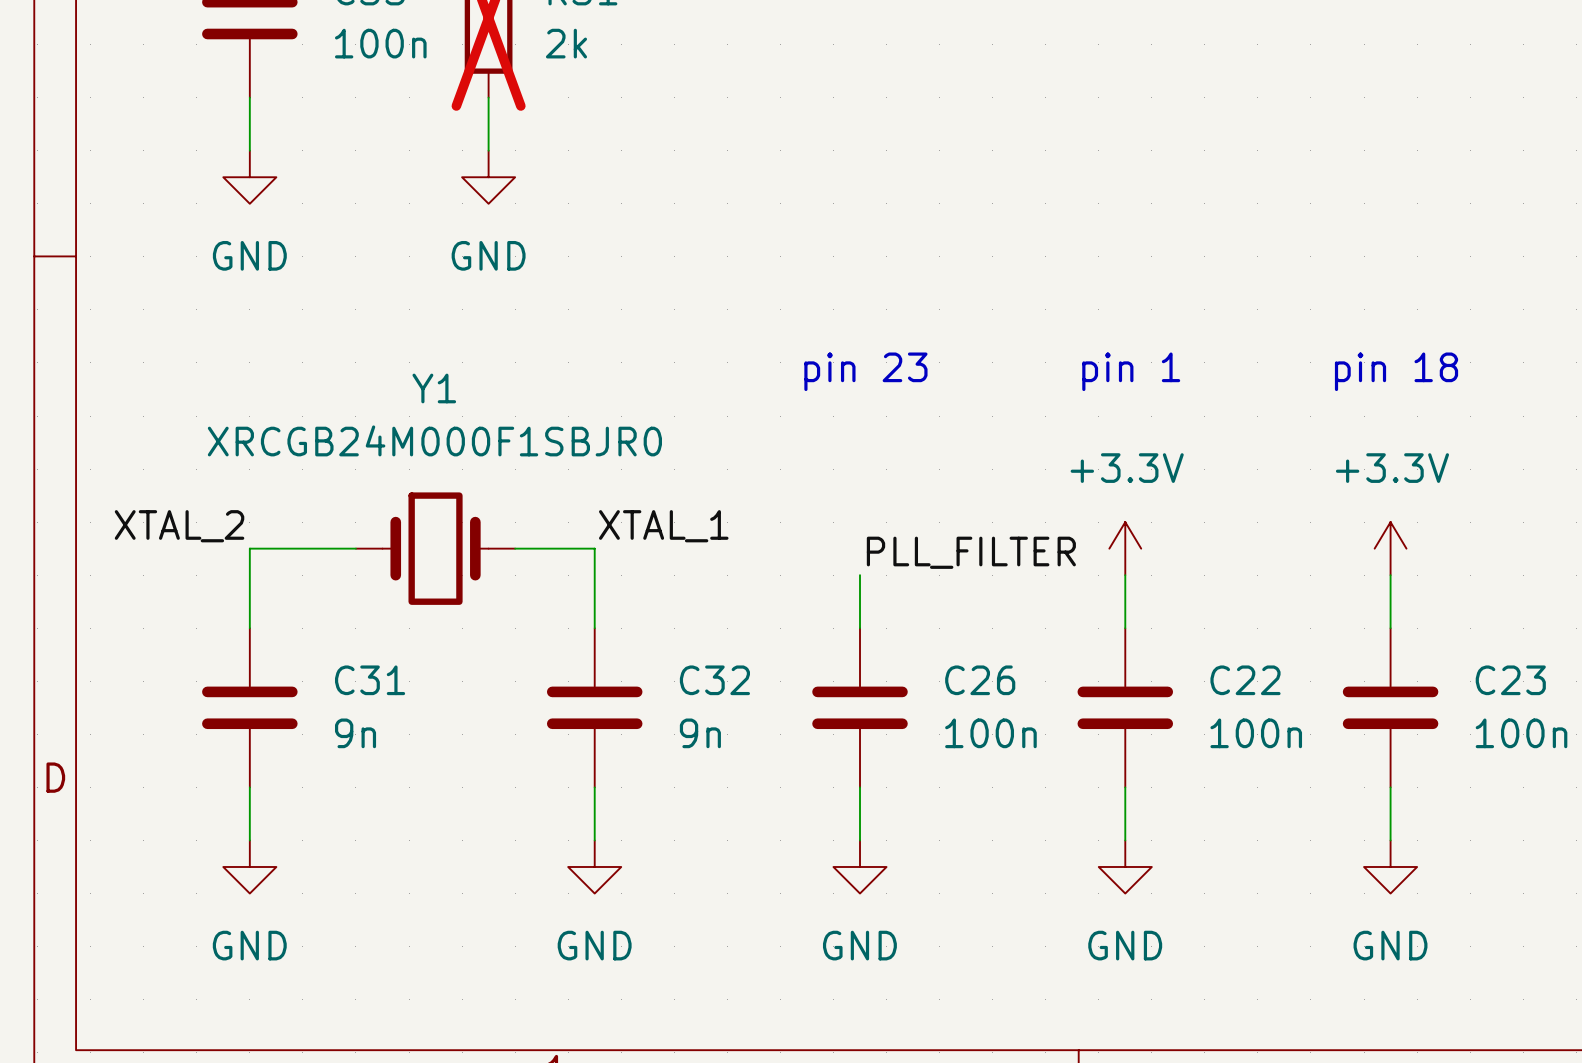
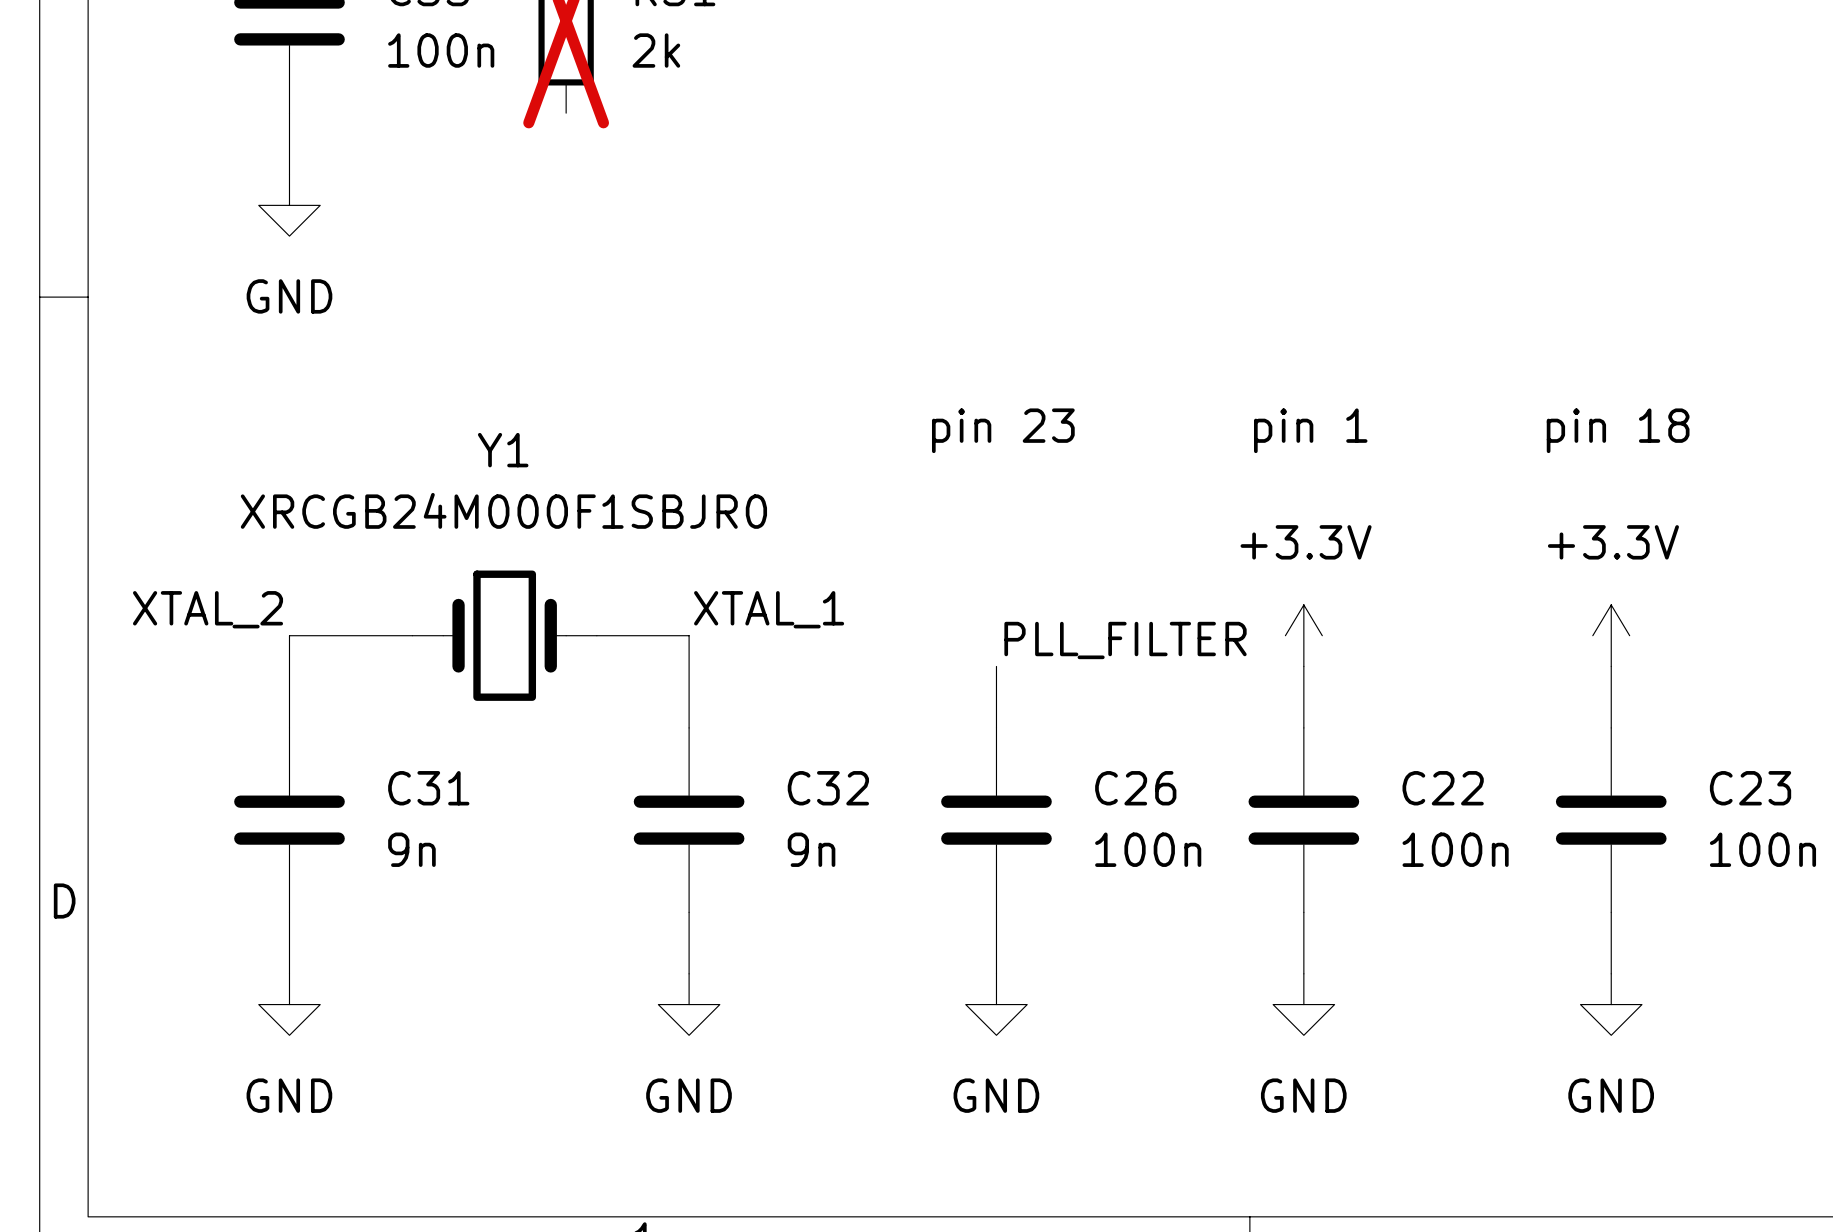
wire: (488, 97) (488, 150) -> none
power symbol: GND (488, 177) -> none

